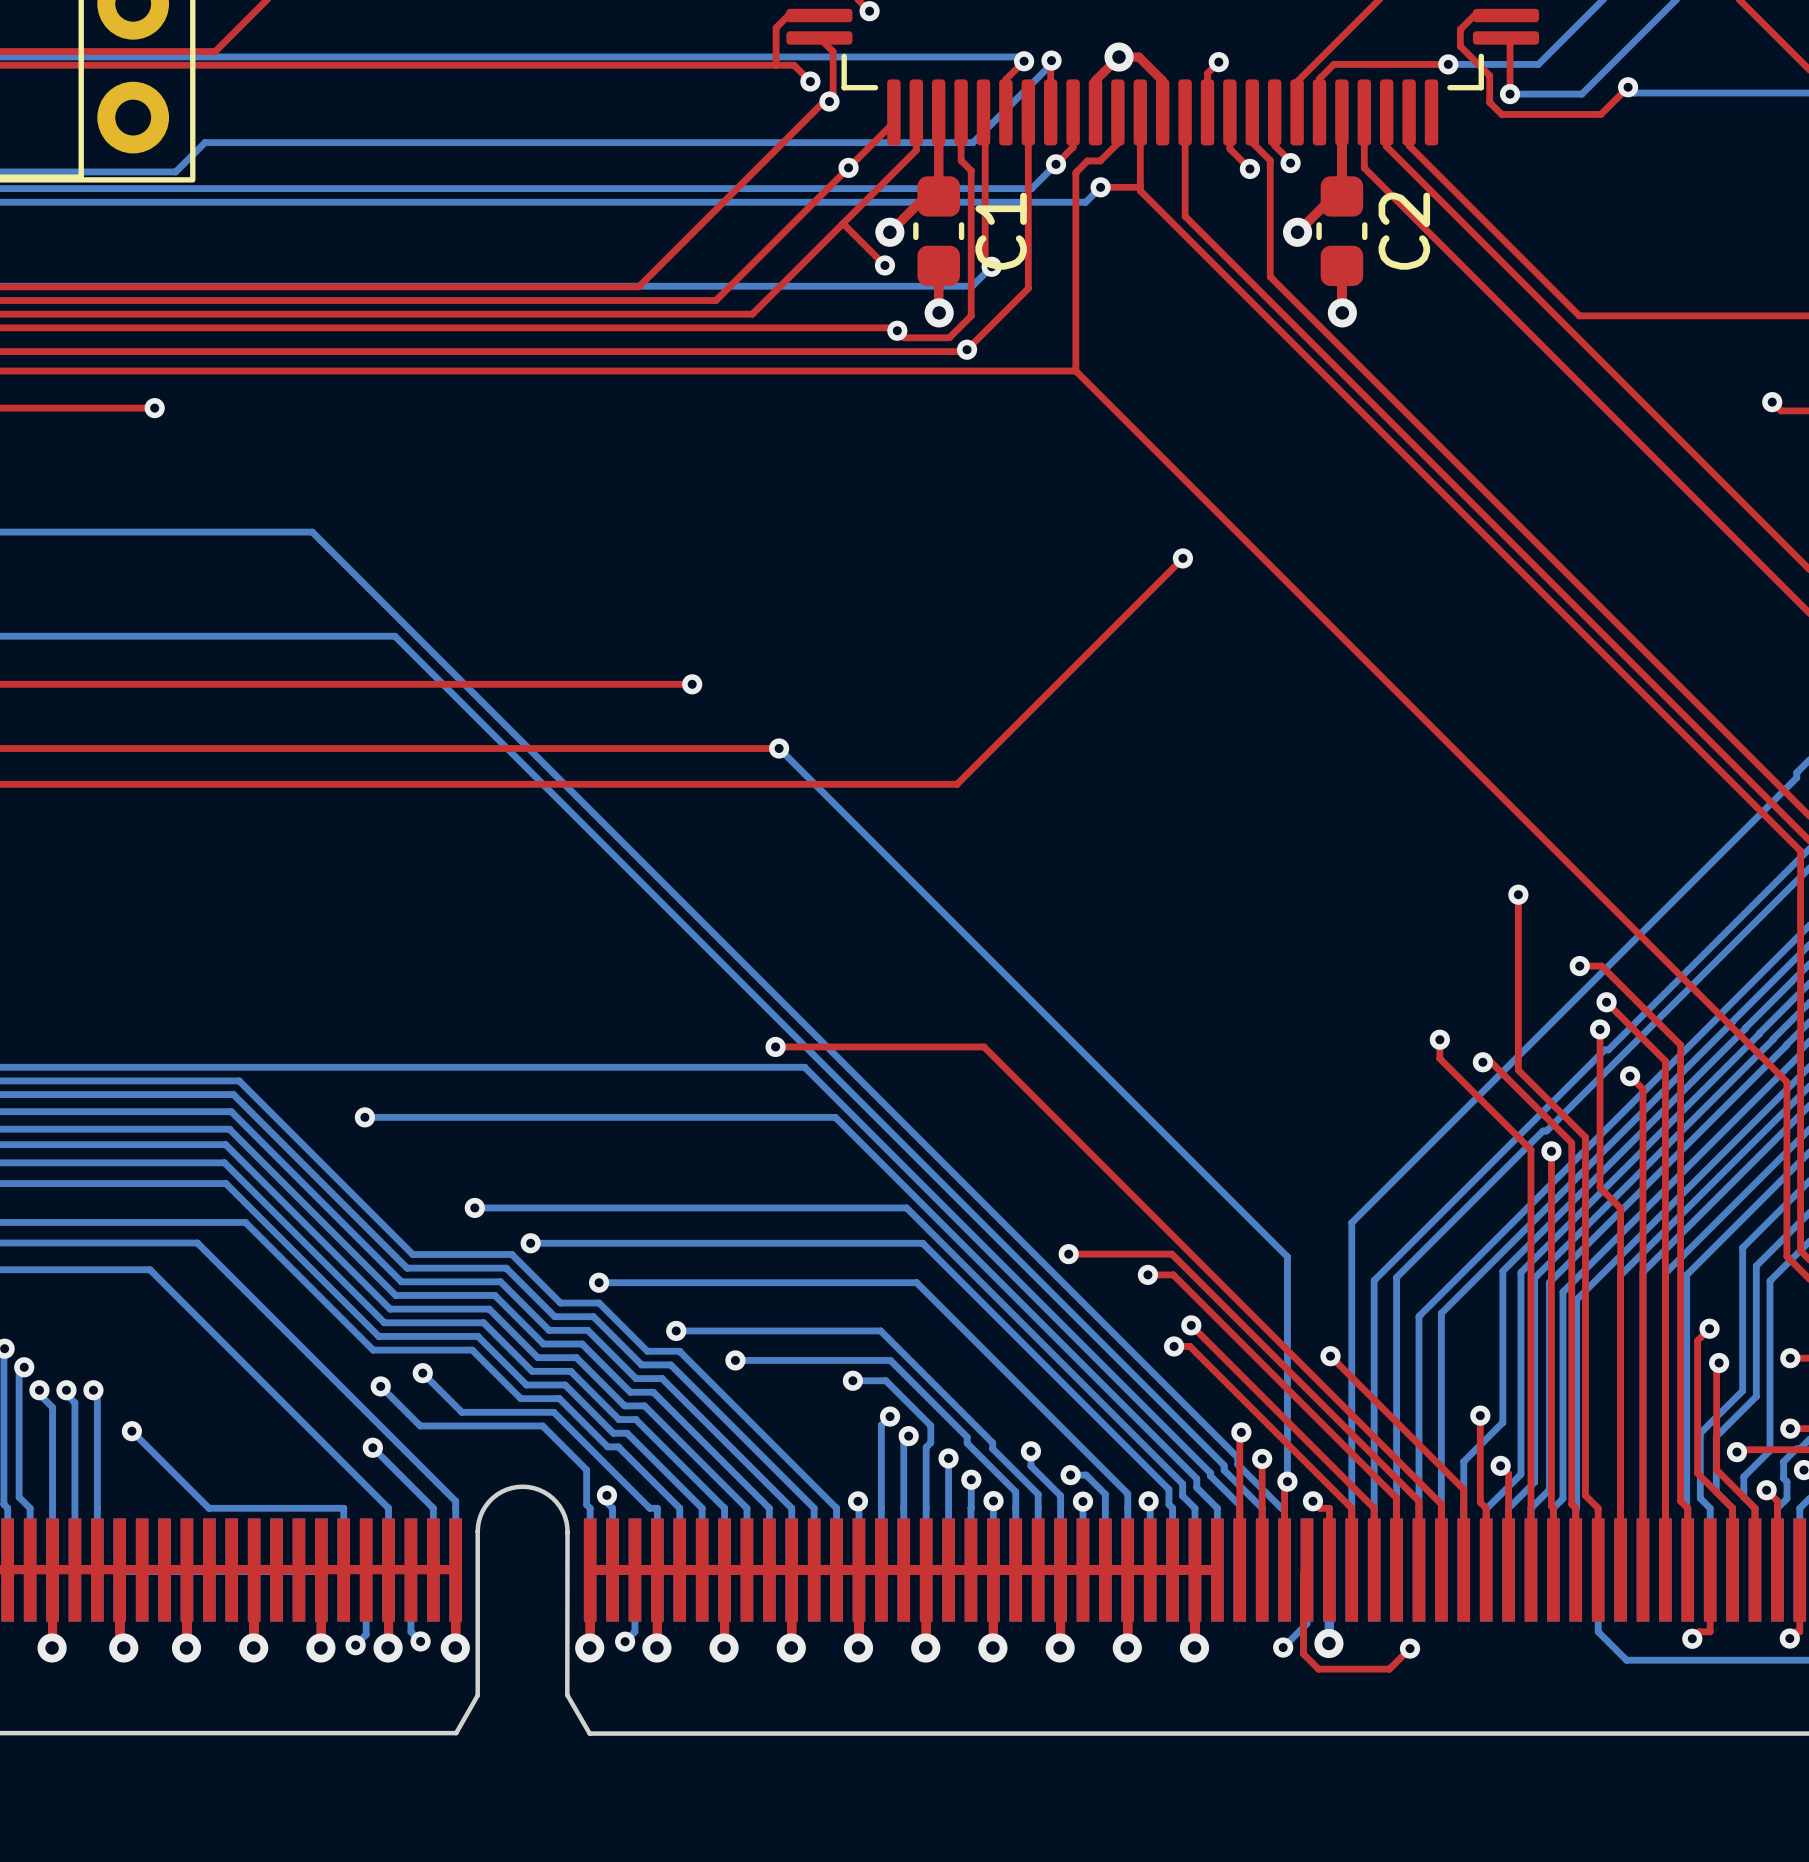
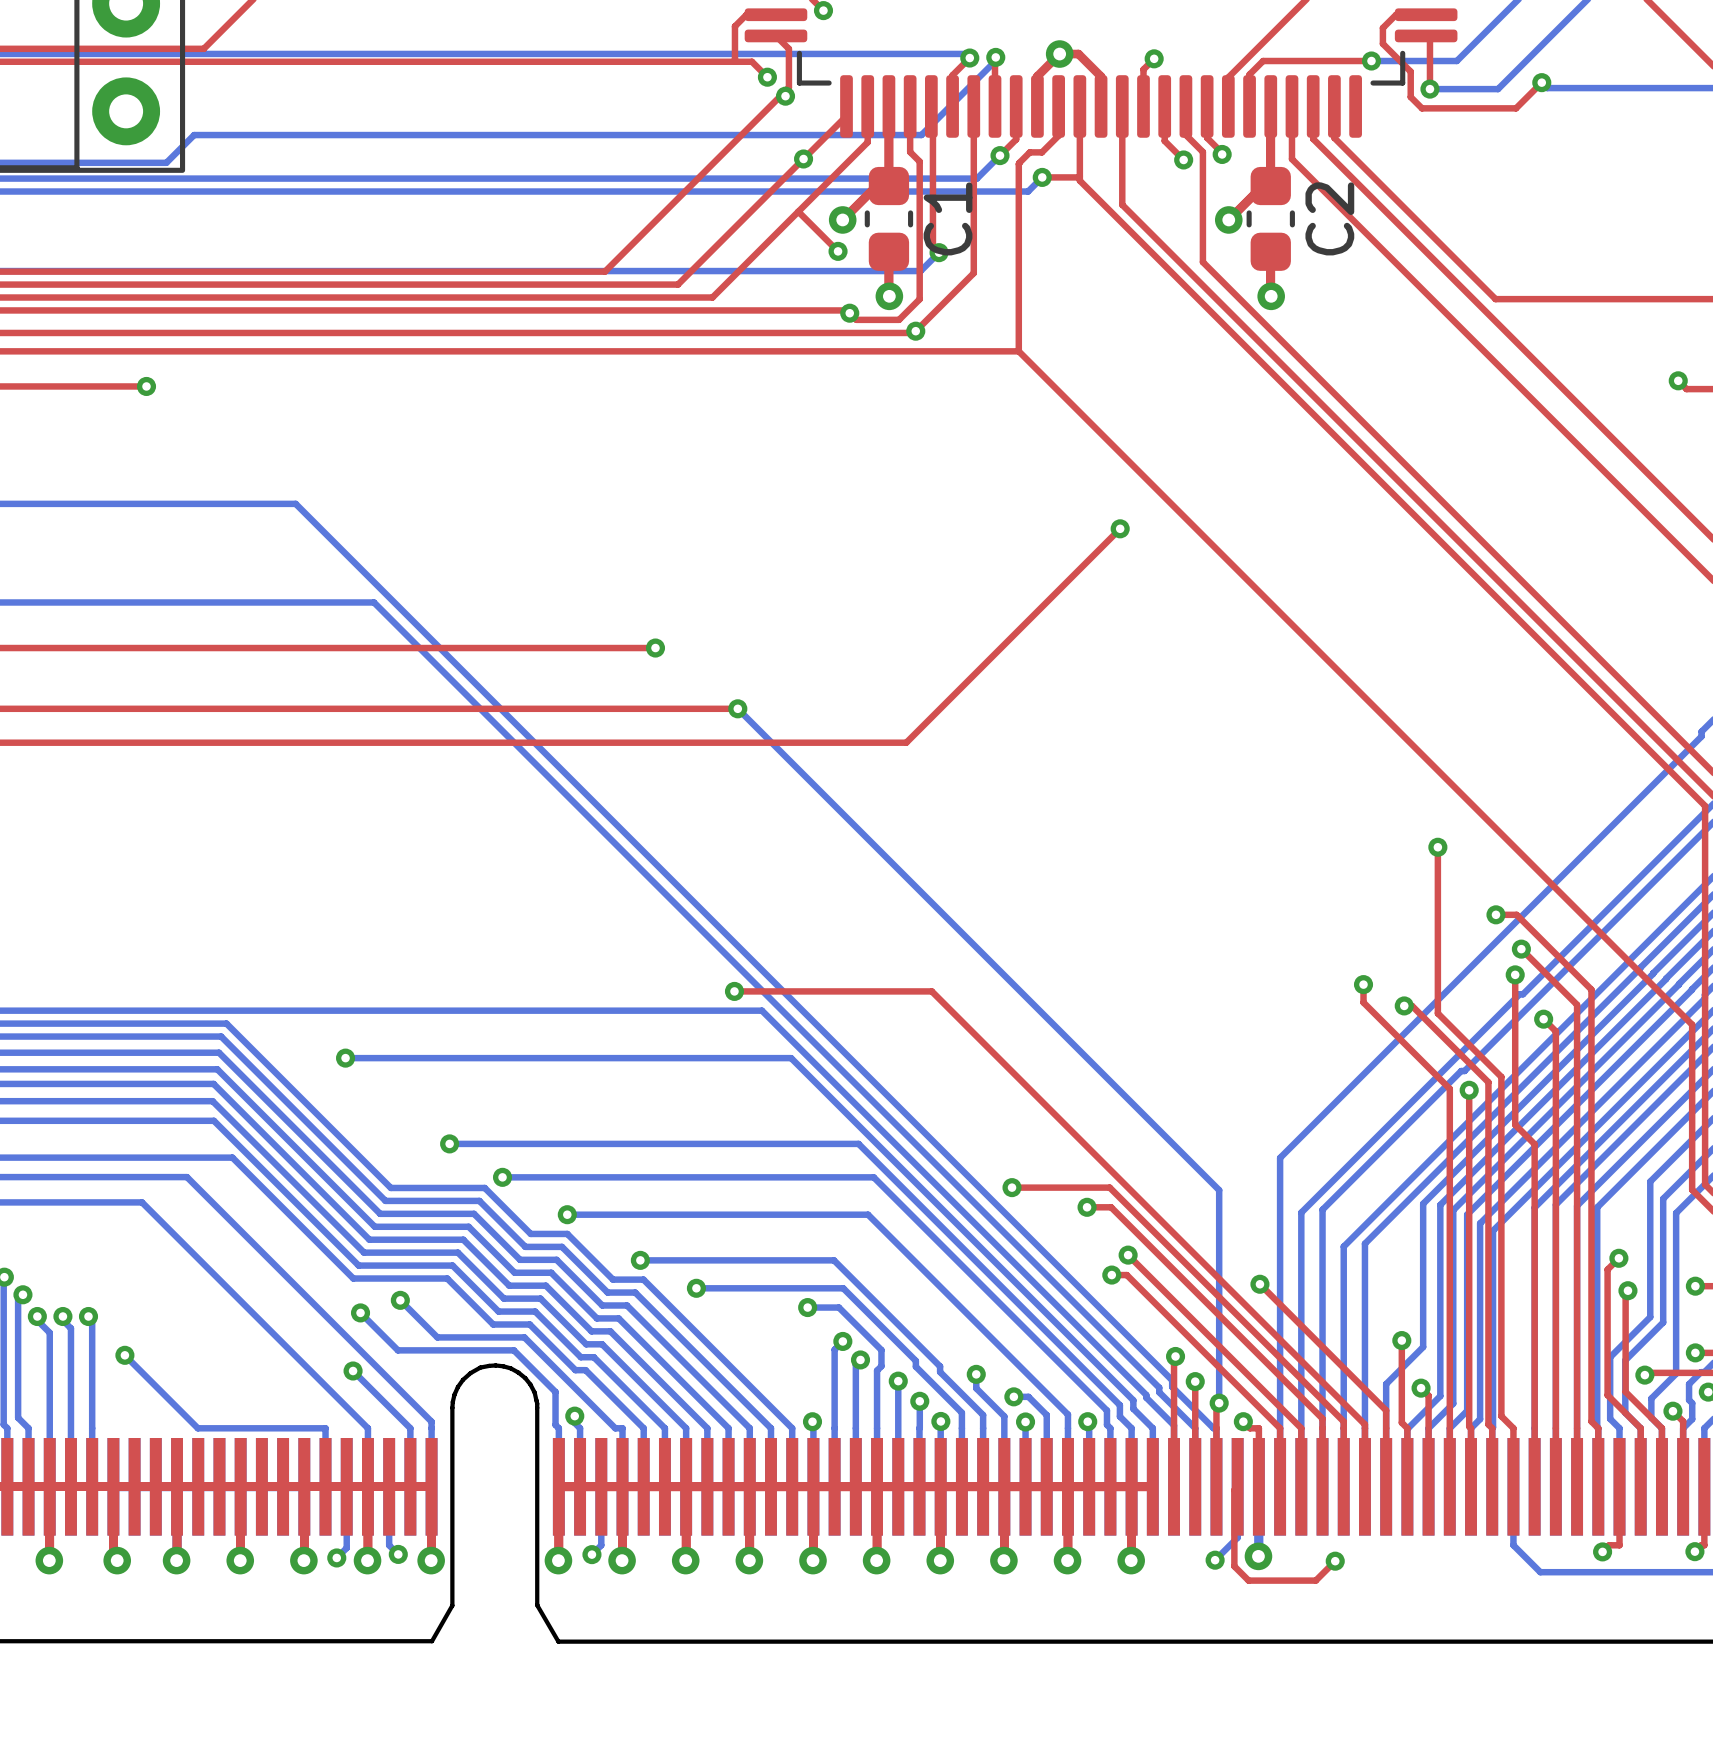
board edge: (477, 1531) (480, 1515) (485, 1505) (497, 1494) (512, 1487) (528, 1487) (543, 1492) (552, 1498) (562, 1511) (567, 1532) (567, 1695) (589, 1733) -> (452, 1450) (452, 1401) (457, 1387) (462, 1379) (480, 1367) (495, 1365) (510, 1368) (525, 1378) (534, 1392) (537, 1403) (537, 1604) (558, 1641)

